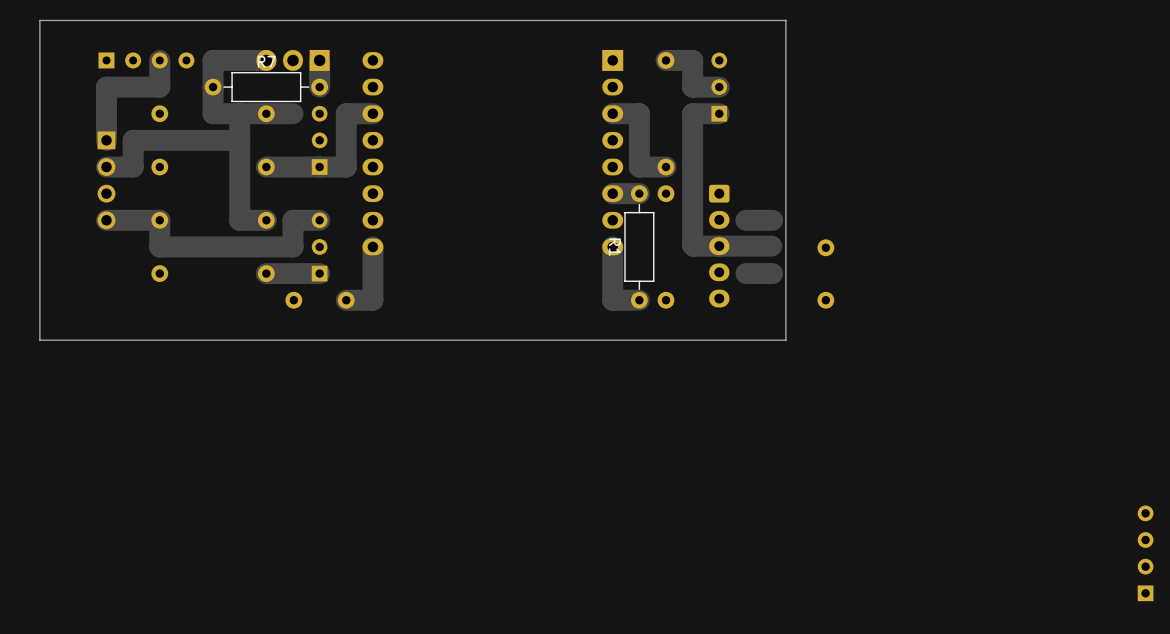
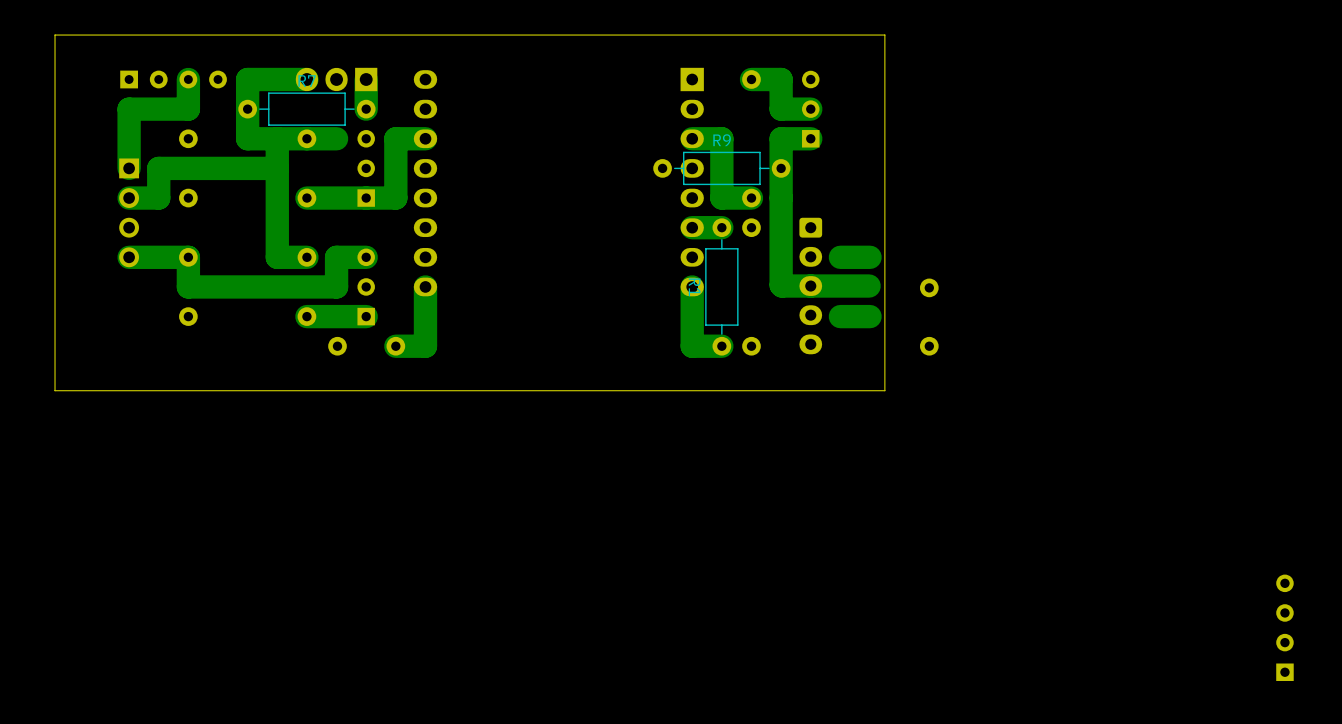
R9: none -> (721, 168)

